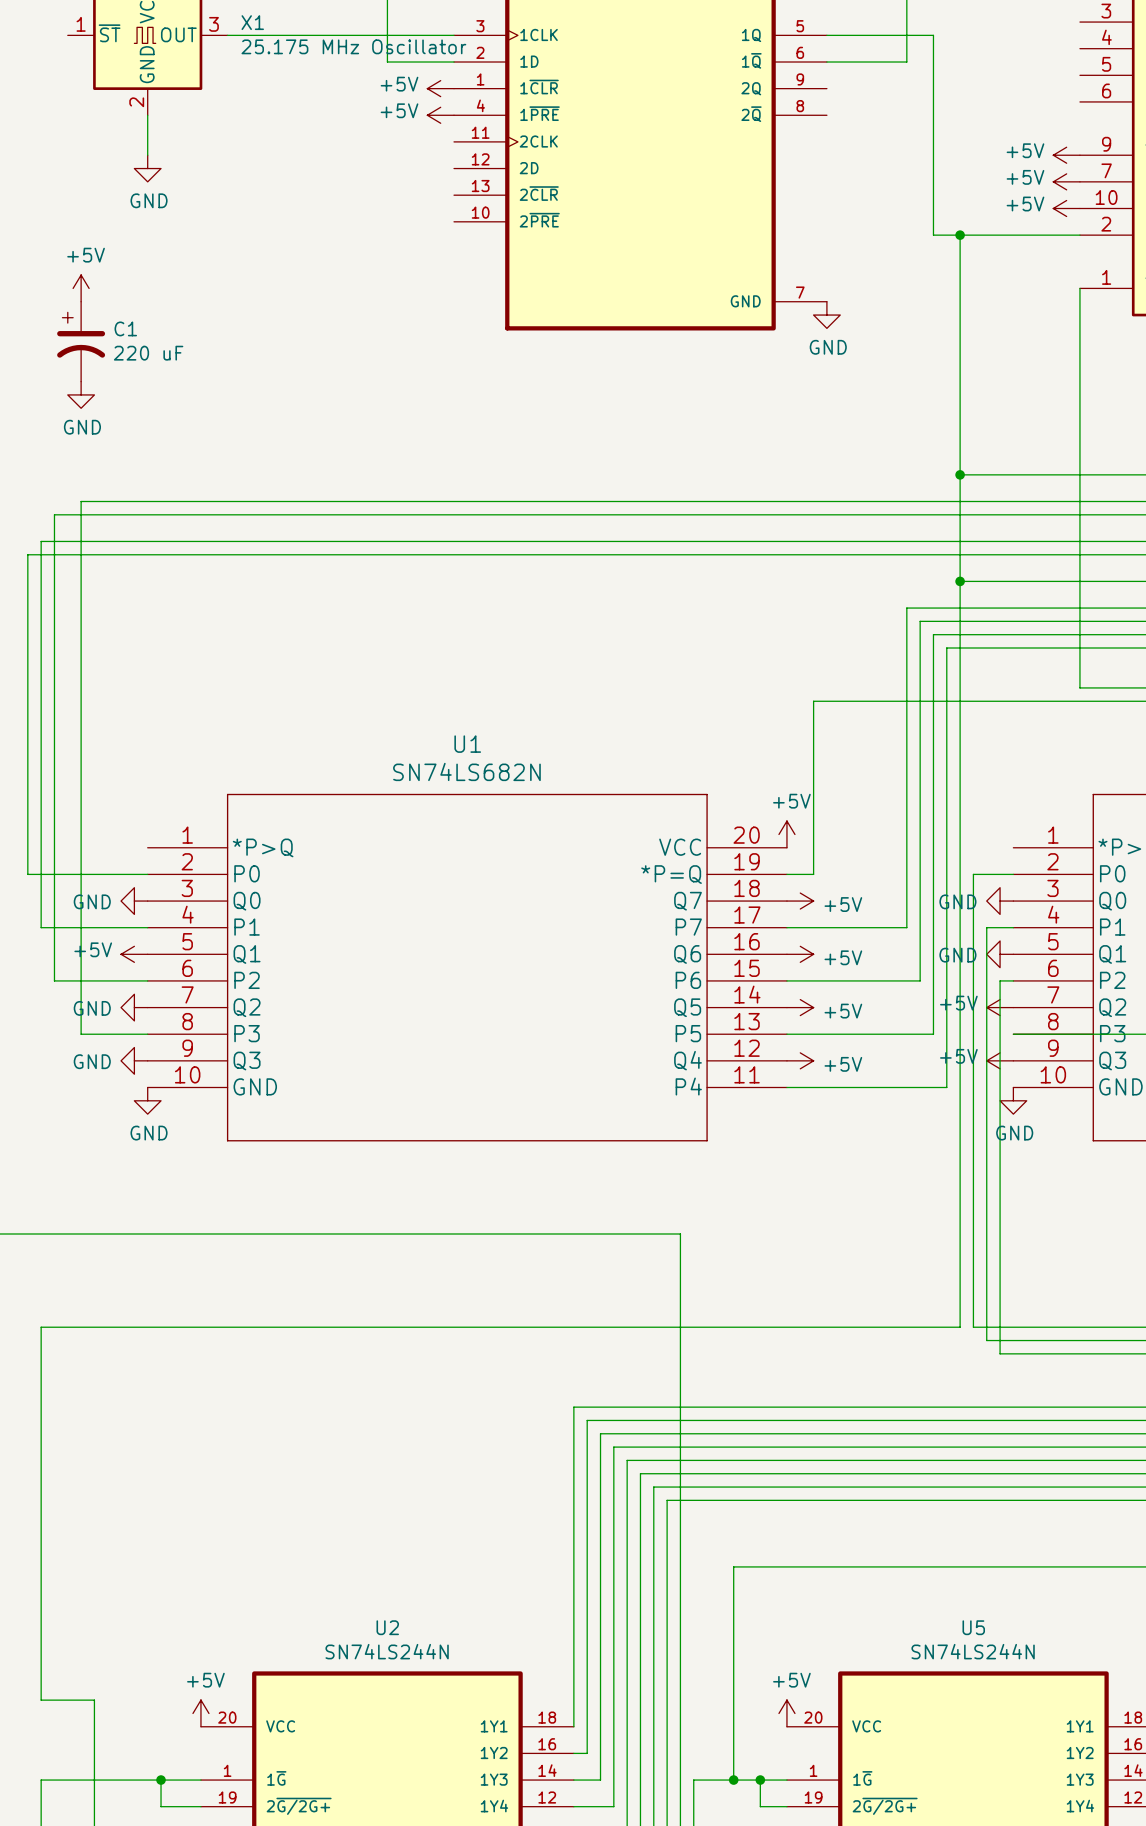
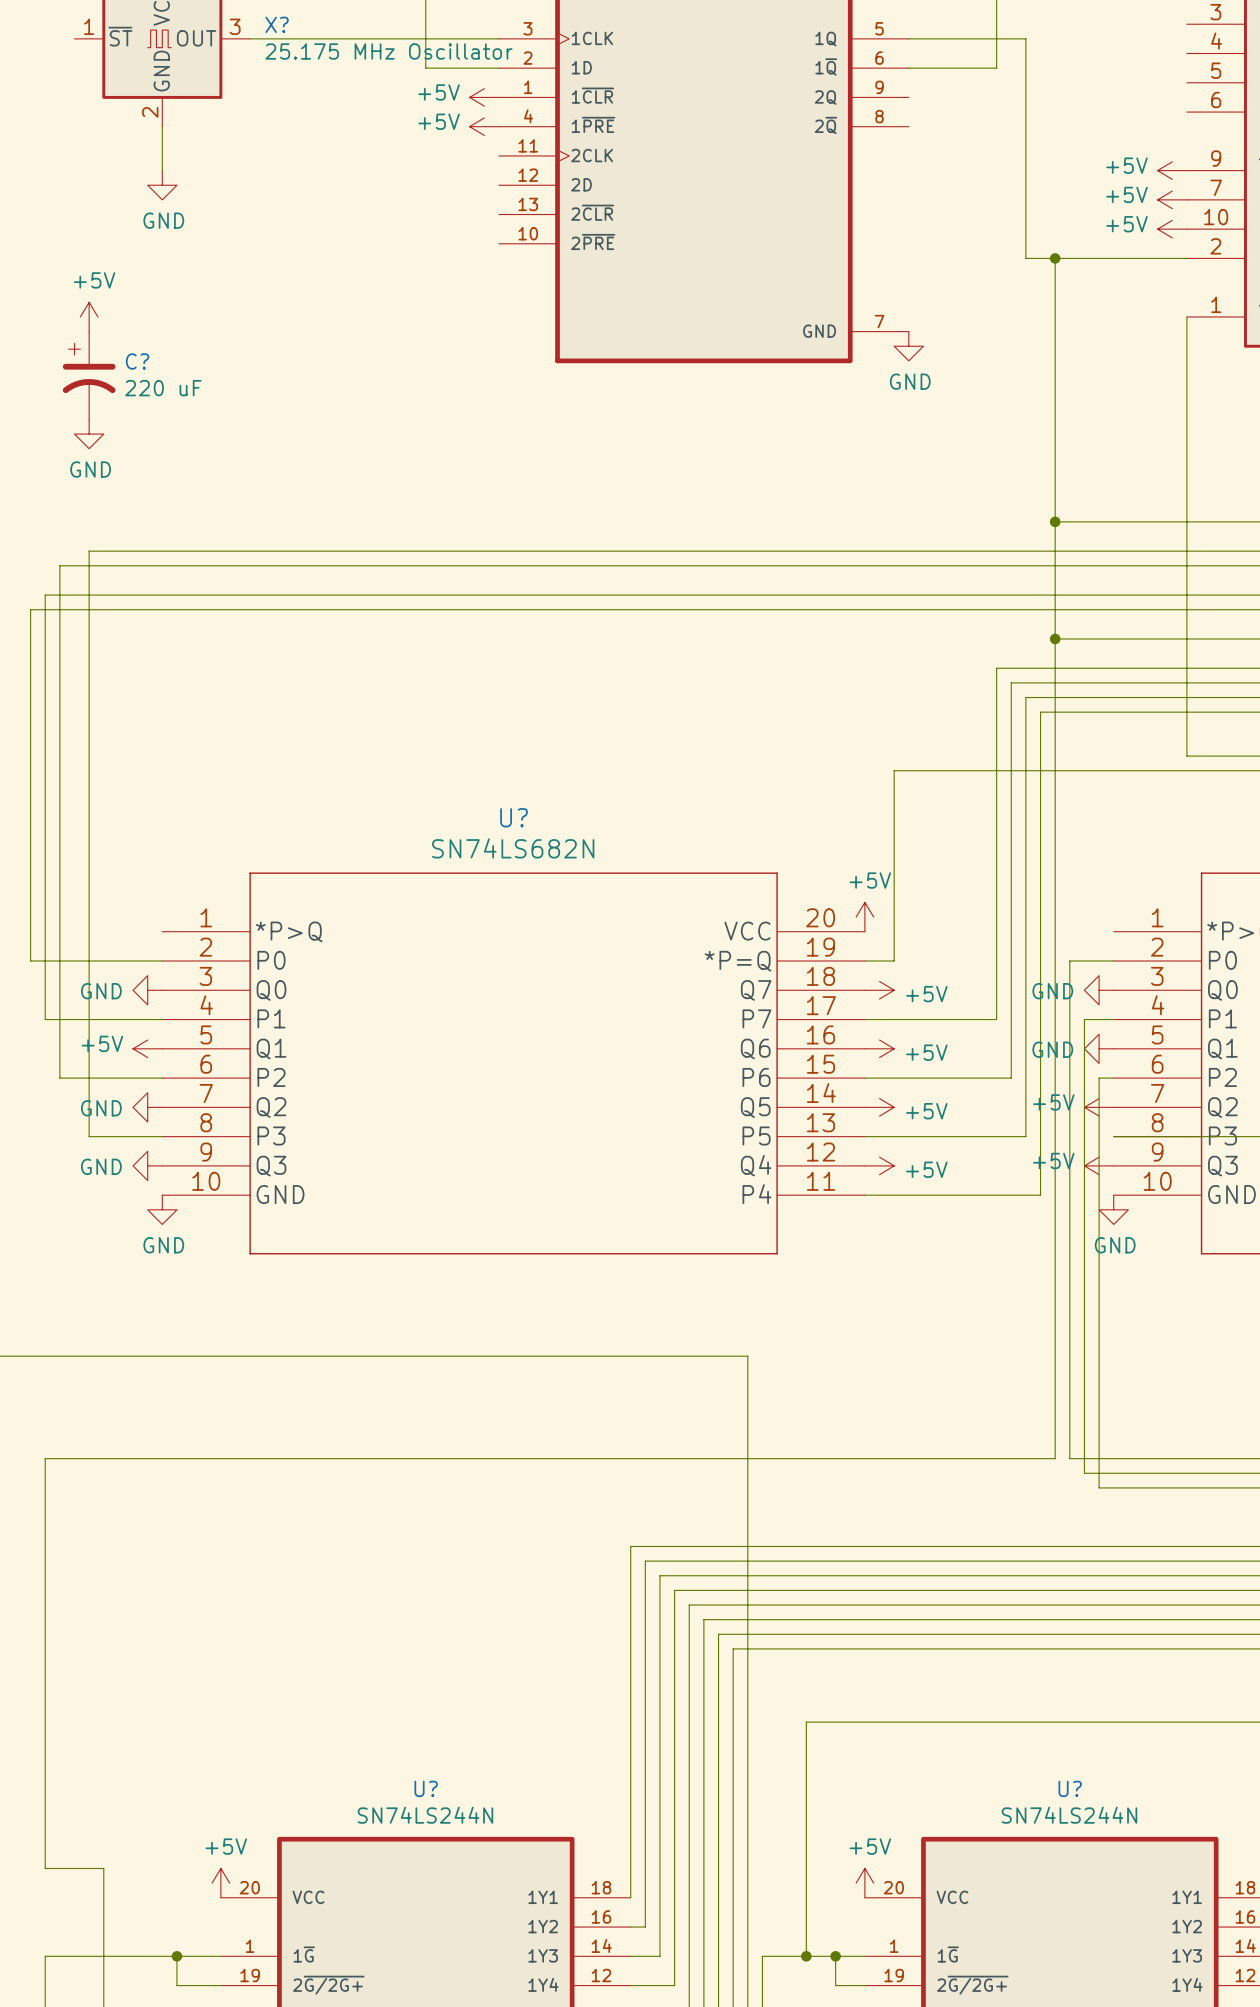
X1 name: X1 (252, 22) -> X? (277, 24)
C1 name: C1 (125, 328) -> C? (137, 361)
U1 name: U1 (467, 744) -> U? (514, 817)
U2 name: U2 (387, 1627) -> U? (426, 1788)
U5 name: U5 (973, 1627) -> U? (1070, 1788)

